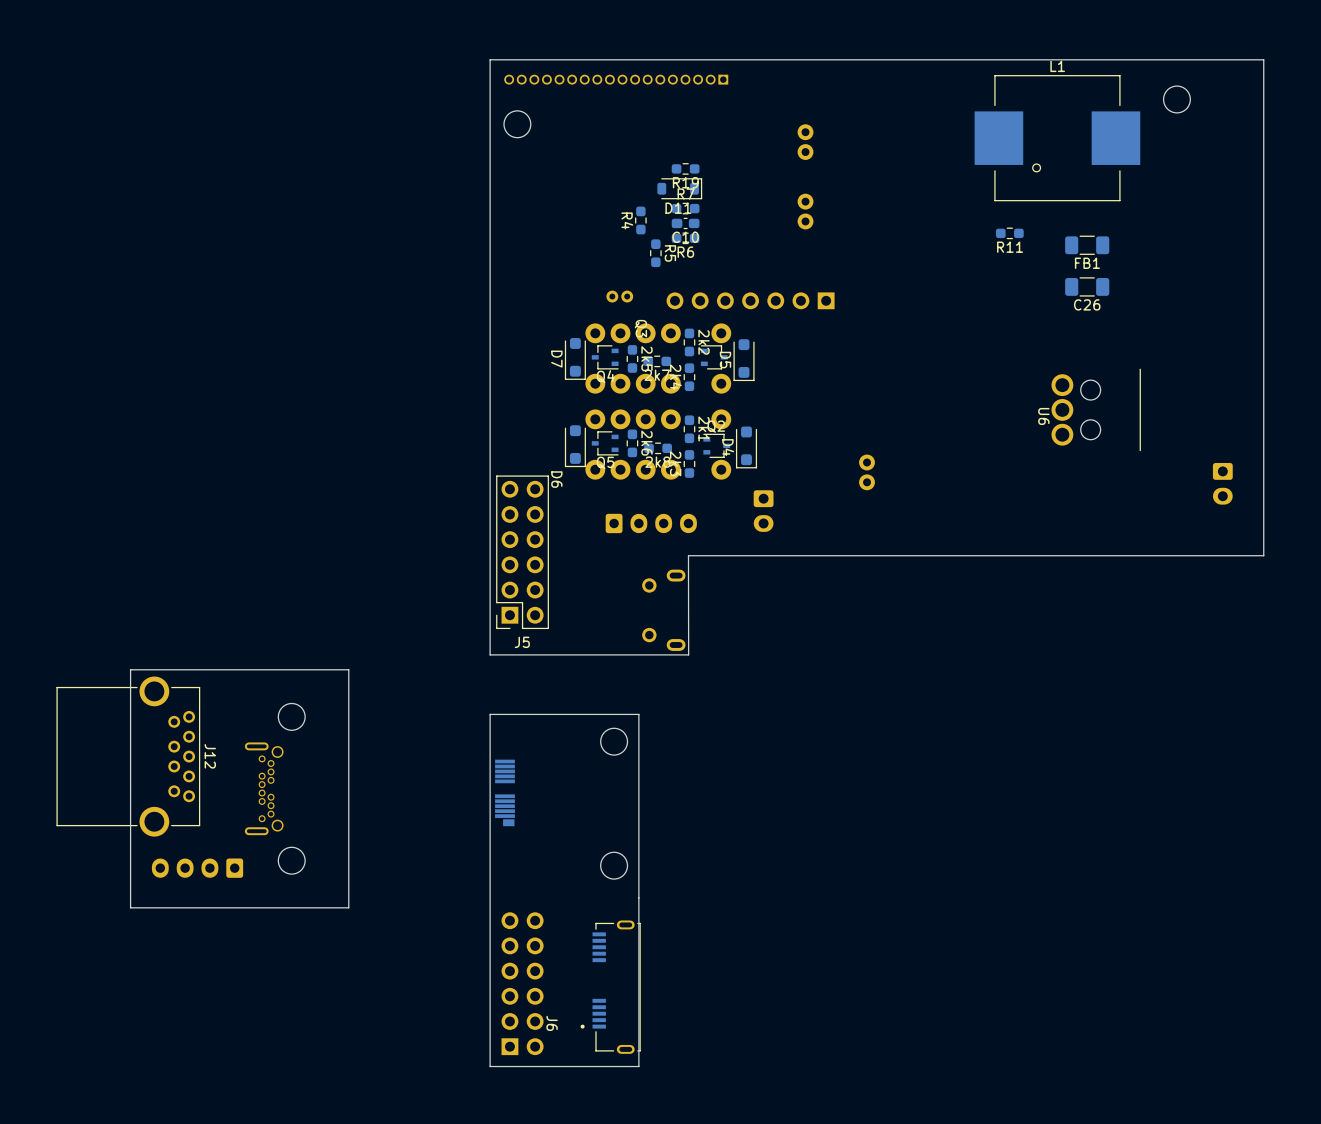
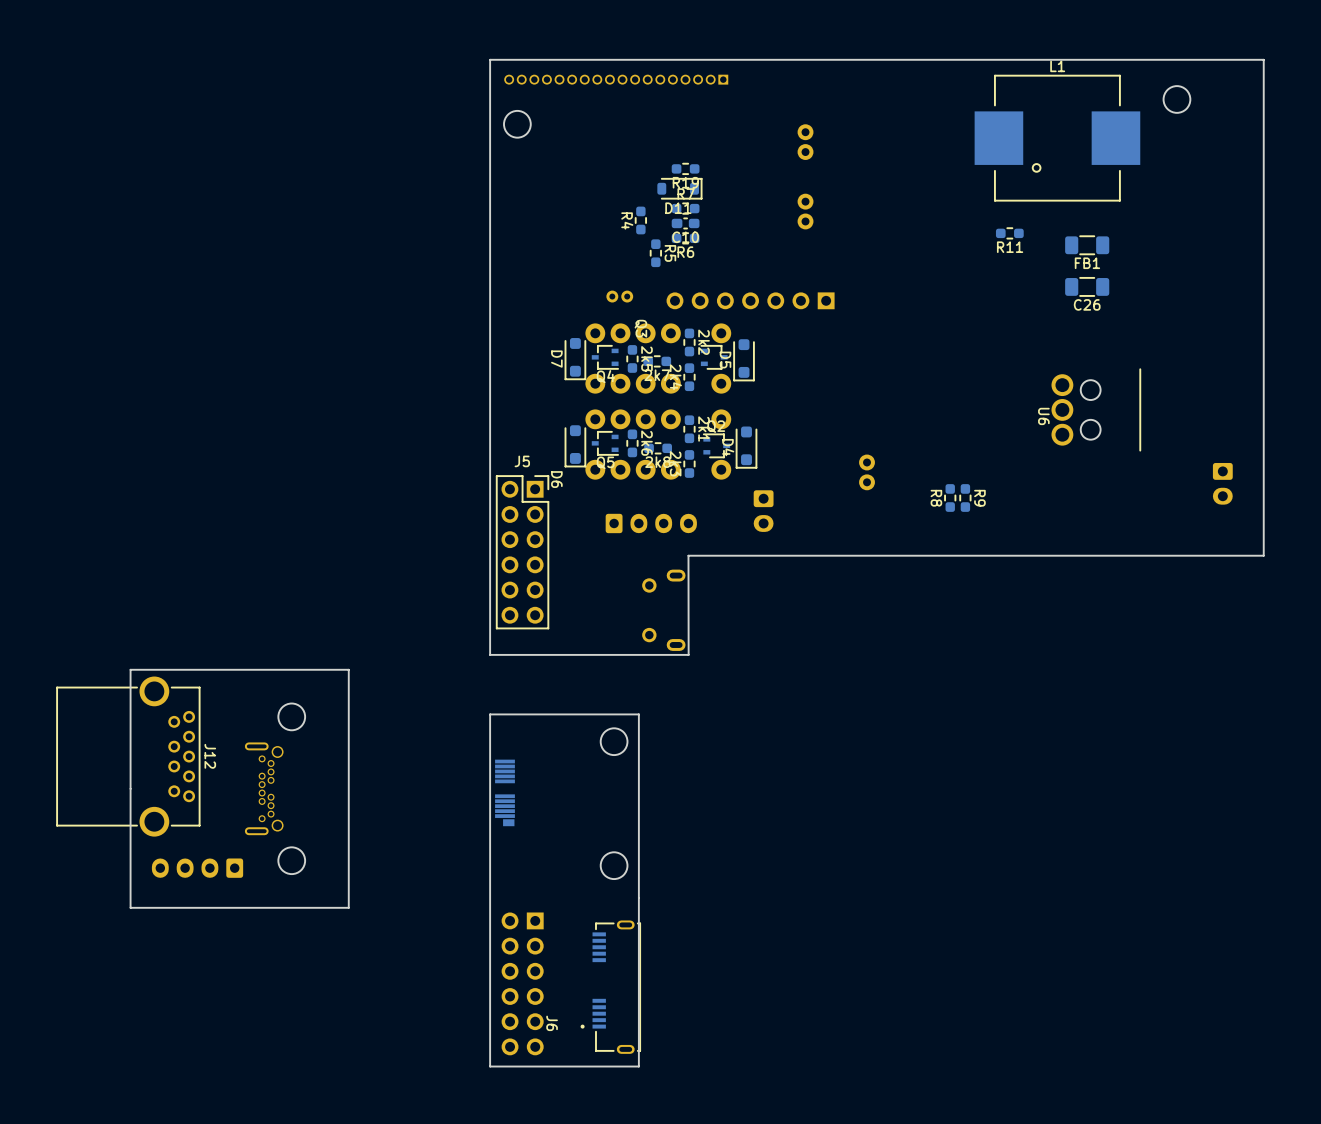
R8: none -> (950, 498)
R9: none -> (965, 498)
J5 rotation: 0° (522, 552) -> 180° (522, 552)
part rotation: 0° (522, 983) -> 180° (522, 983)

